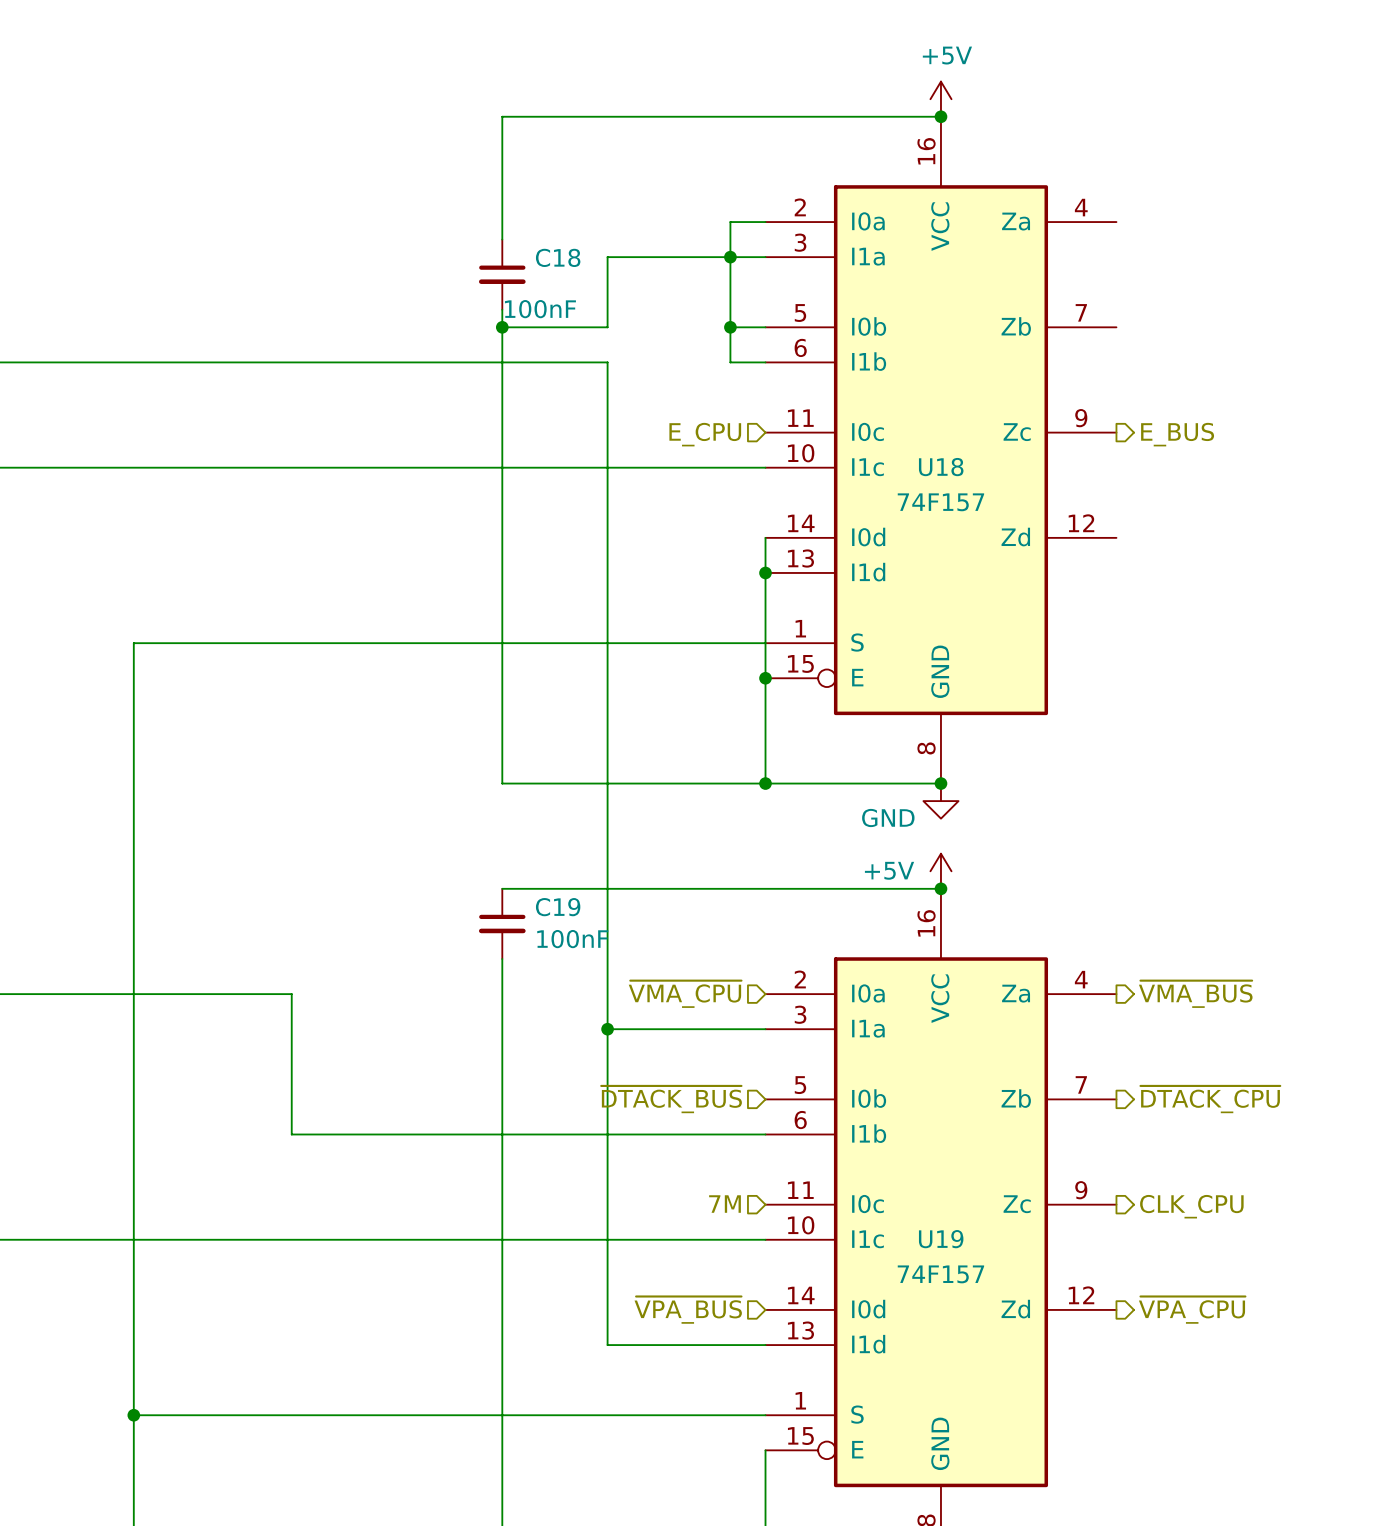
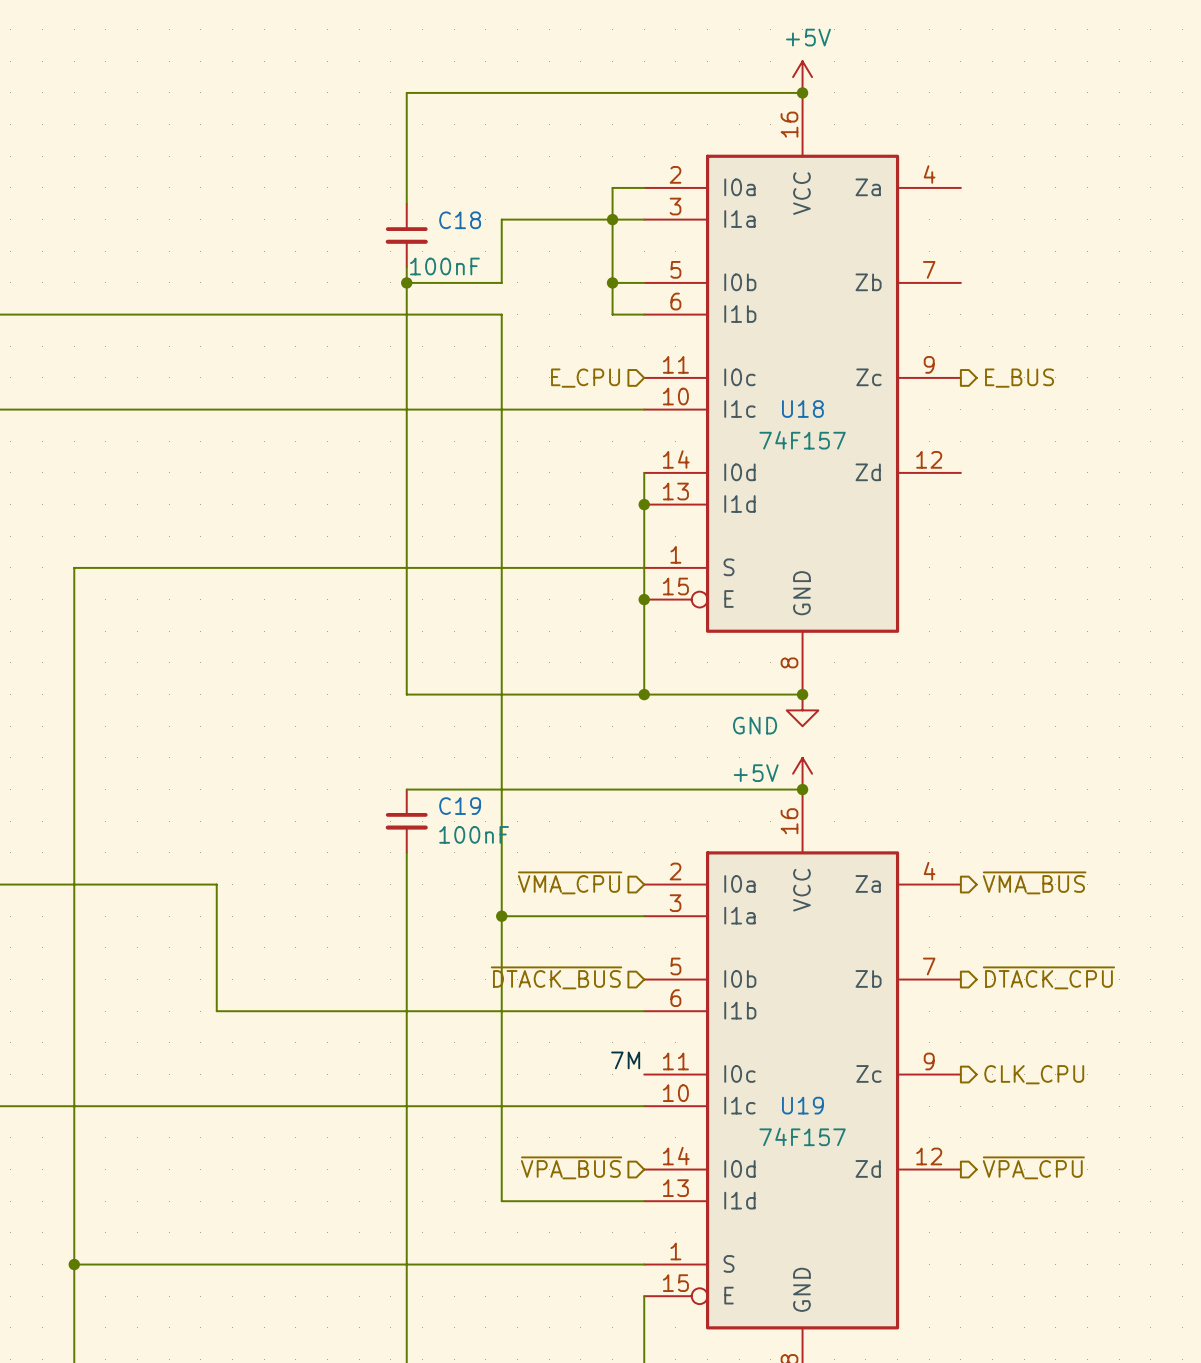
label: none -> 7M (625, 1060)
hierarchical label: 7M (725, 1204) -> none

